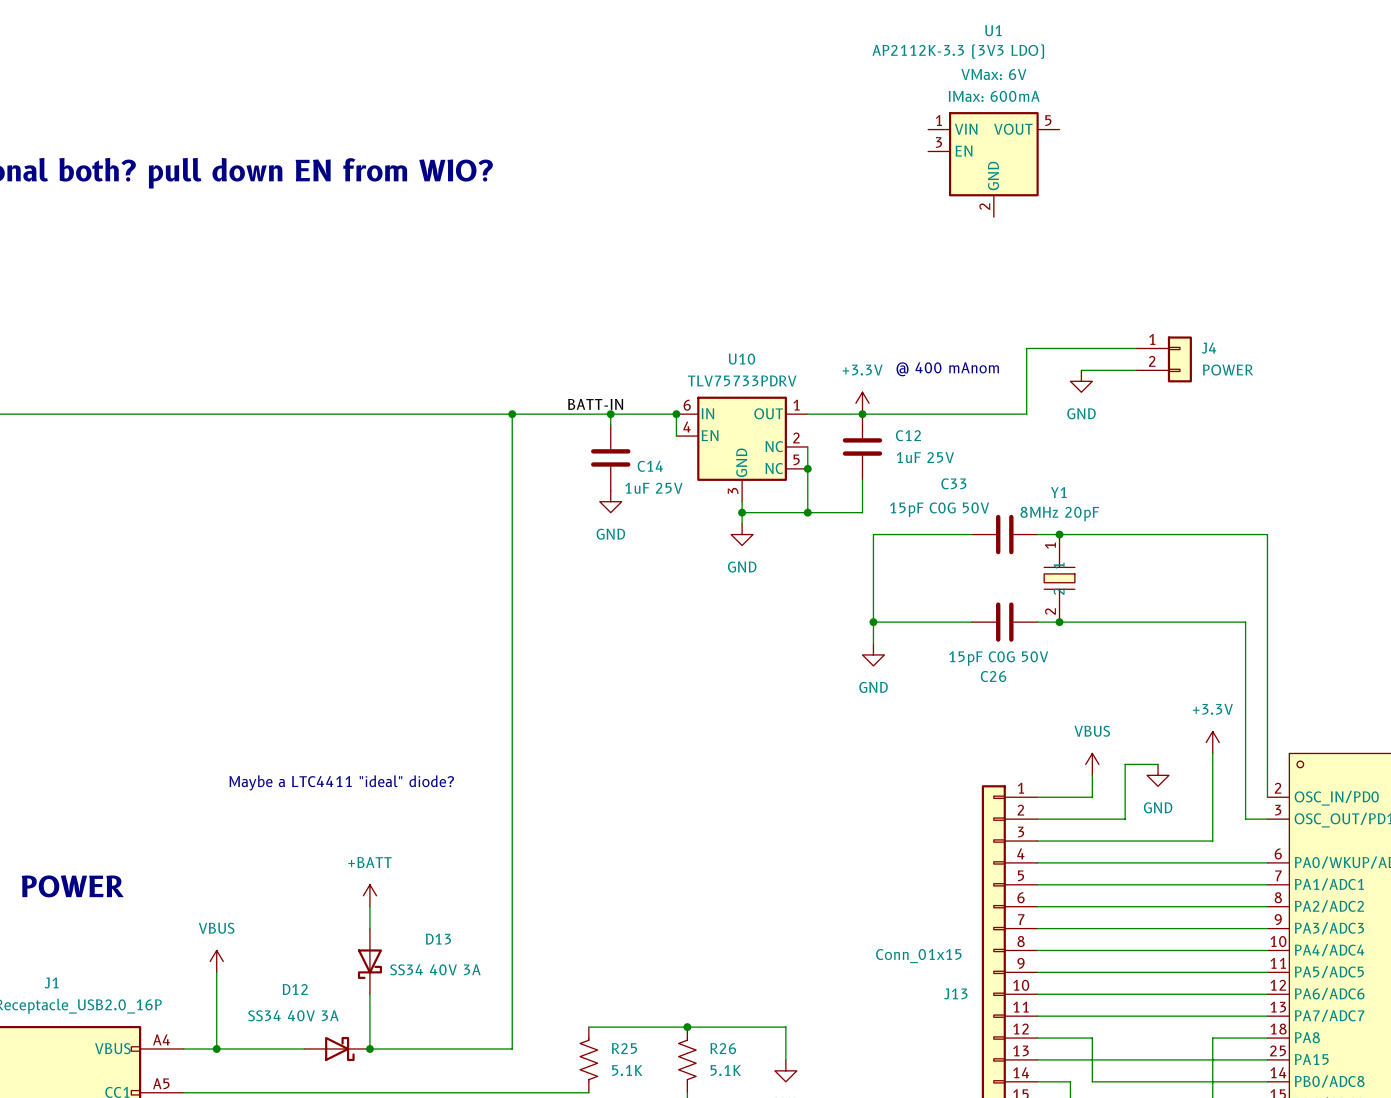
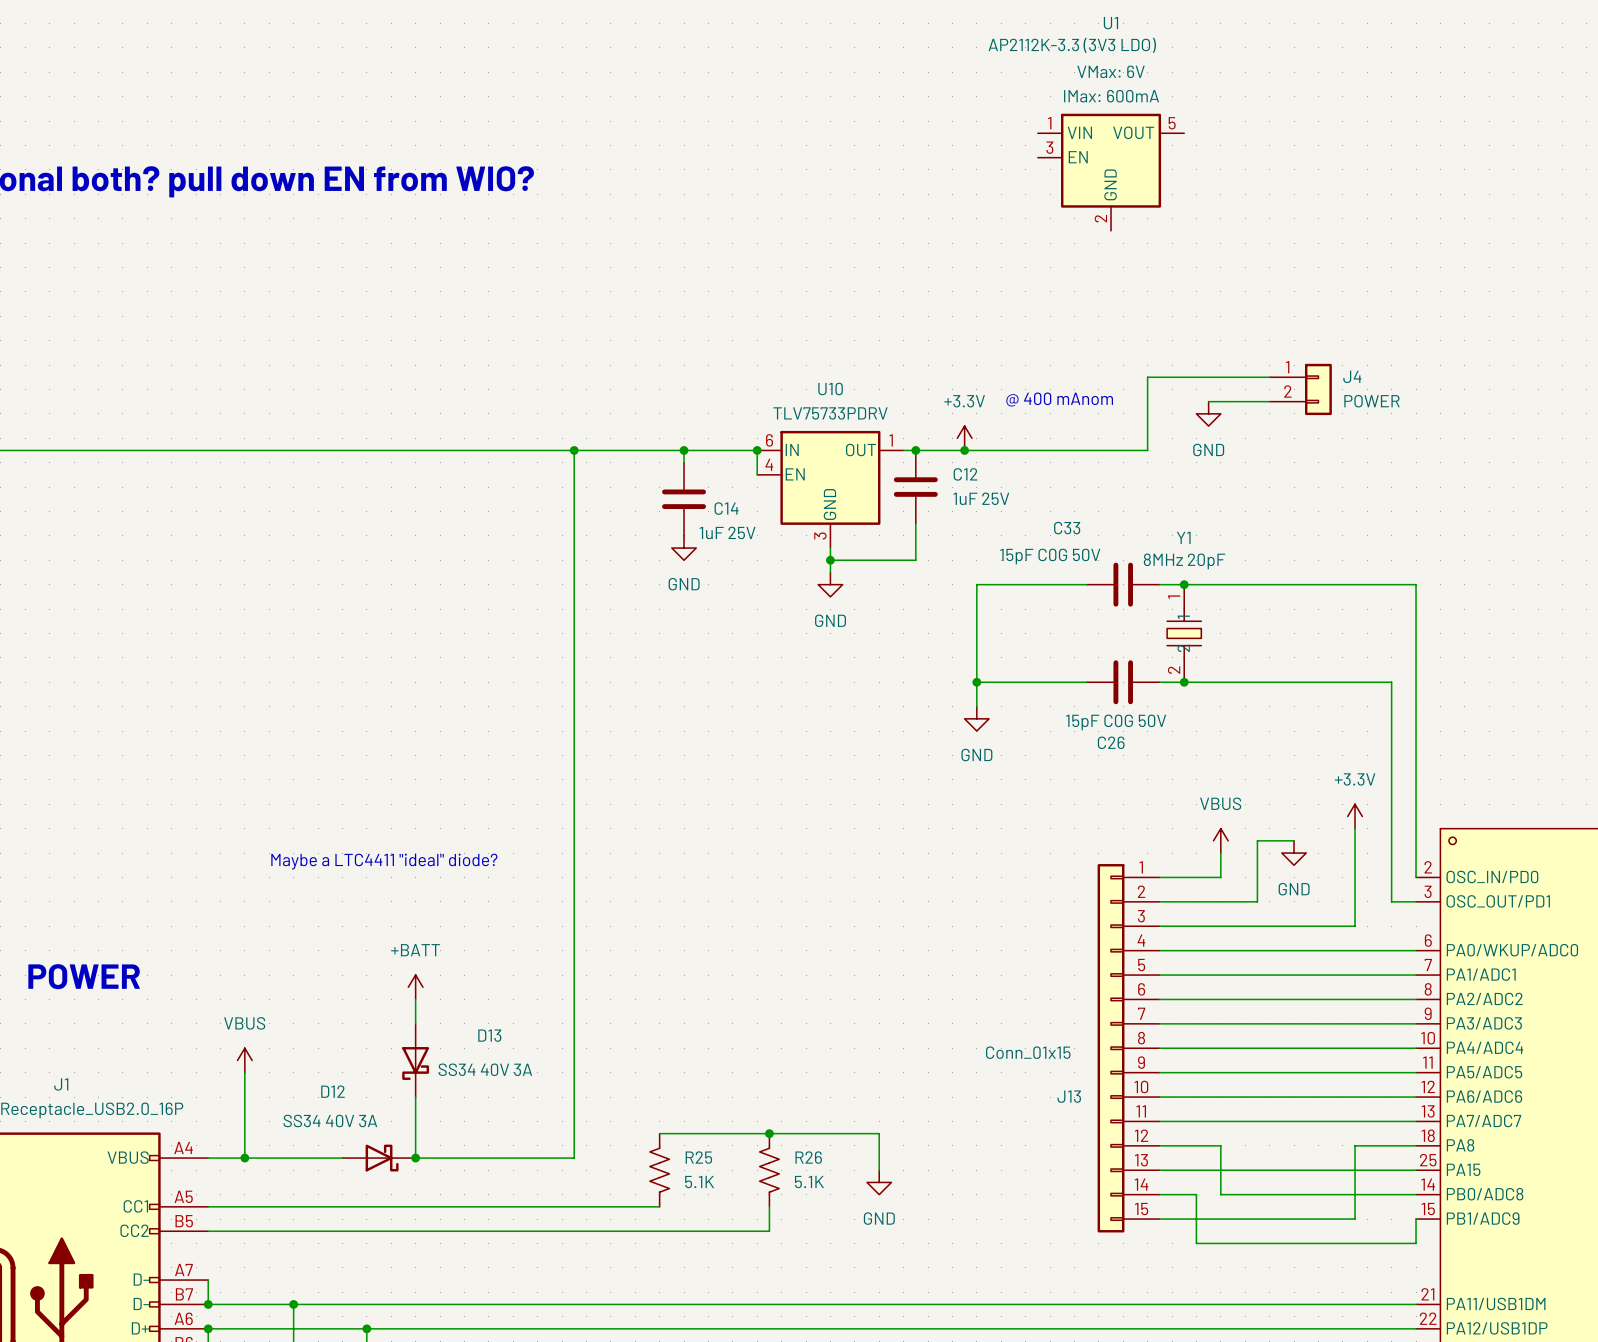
U10 symbol: [676, 396, 808, 502] -> [757, 430, 904, 549]
label: BATT-IN (595, 404) -> none
junction: none -> (915, 450)
wire: (807, 446) (807, 512) -> none
C12 position: (862, 446) -> (915, 487)
junction: (807, 468) -> none
wire: (862, 479) (862, 512) (818, 512) -> (915, 523) (915, 560)
junction: (807, 512) -> none

